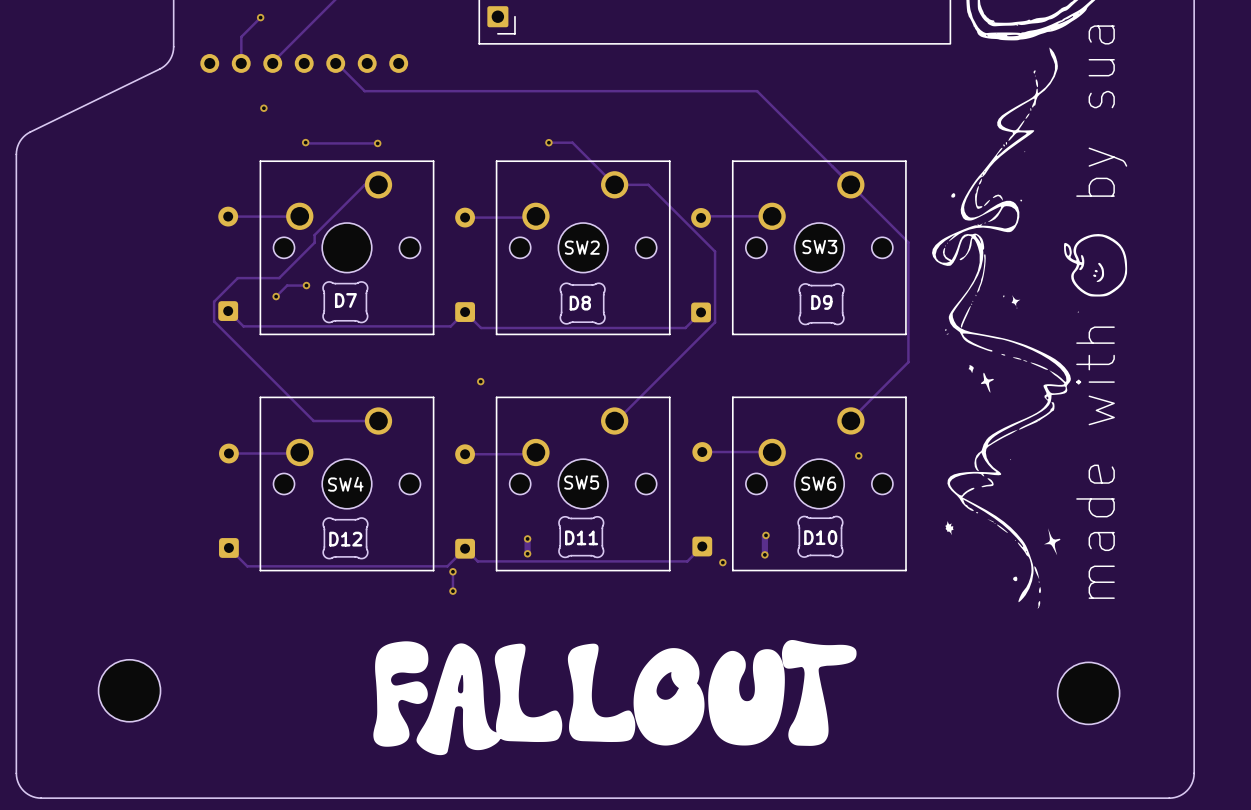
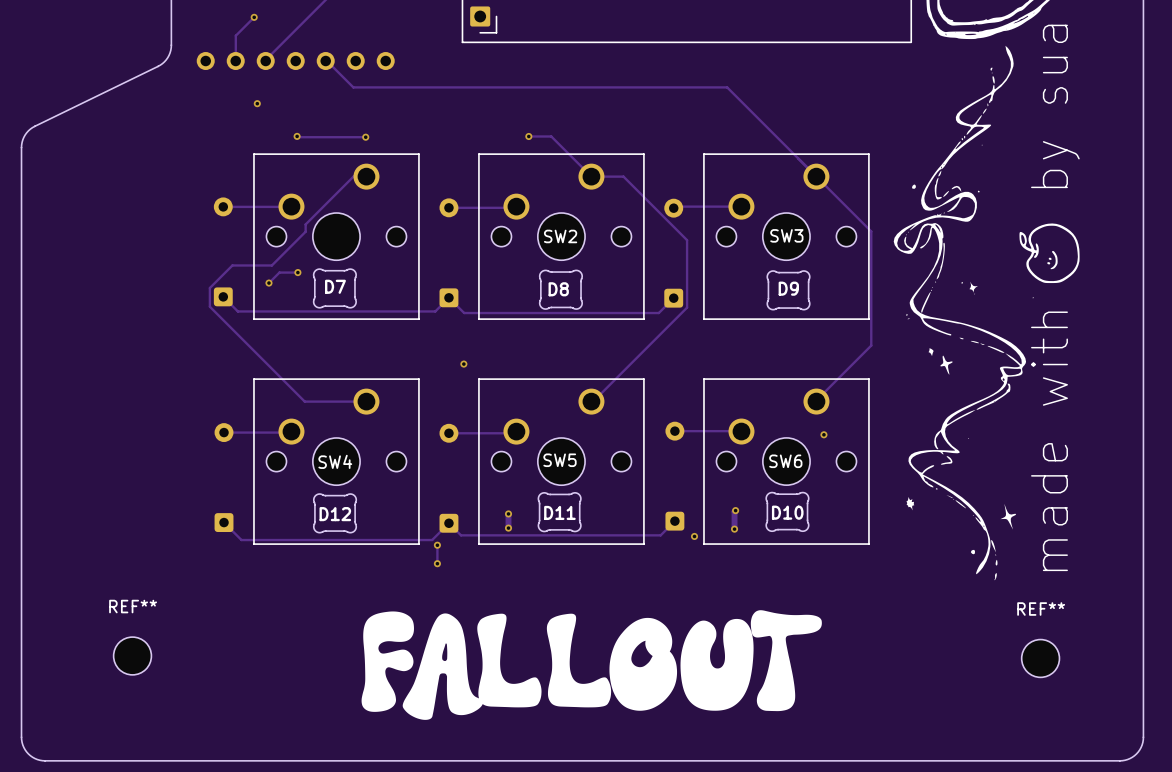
REF**: none -> (132, 655)
part: (129, 690) -> none
REF**: none -> (1040, 658)
part: (1088, 693) -> none

